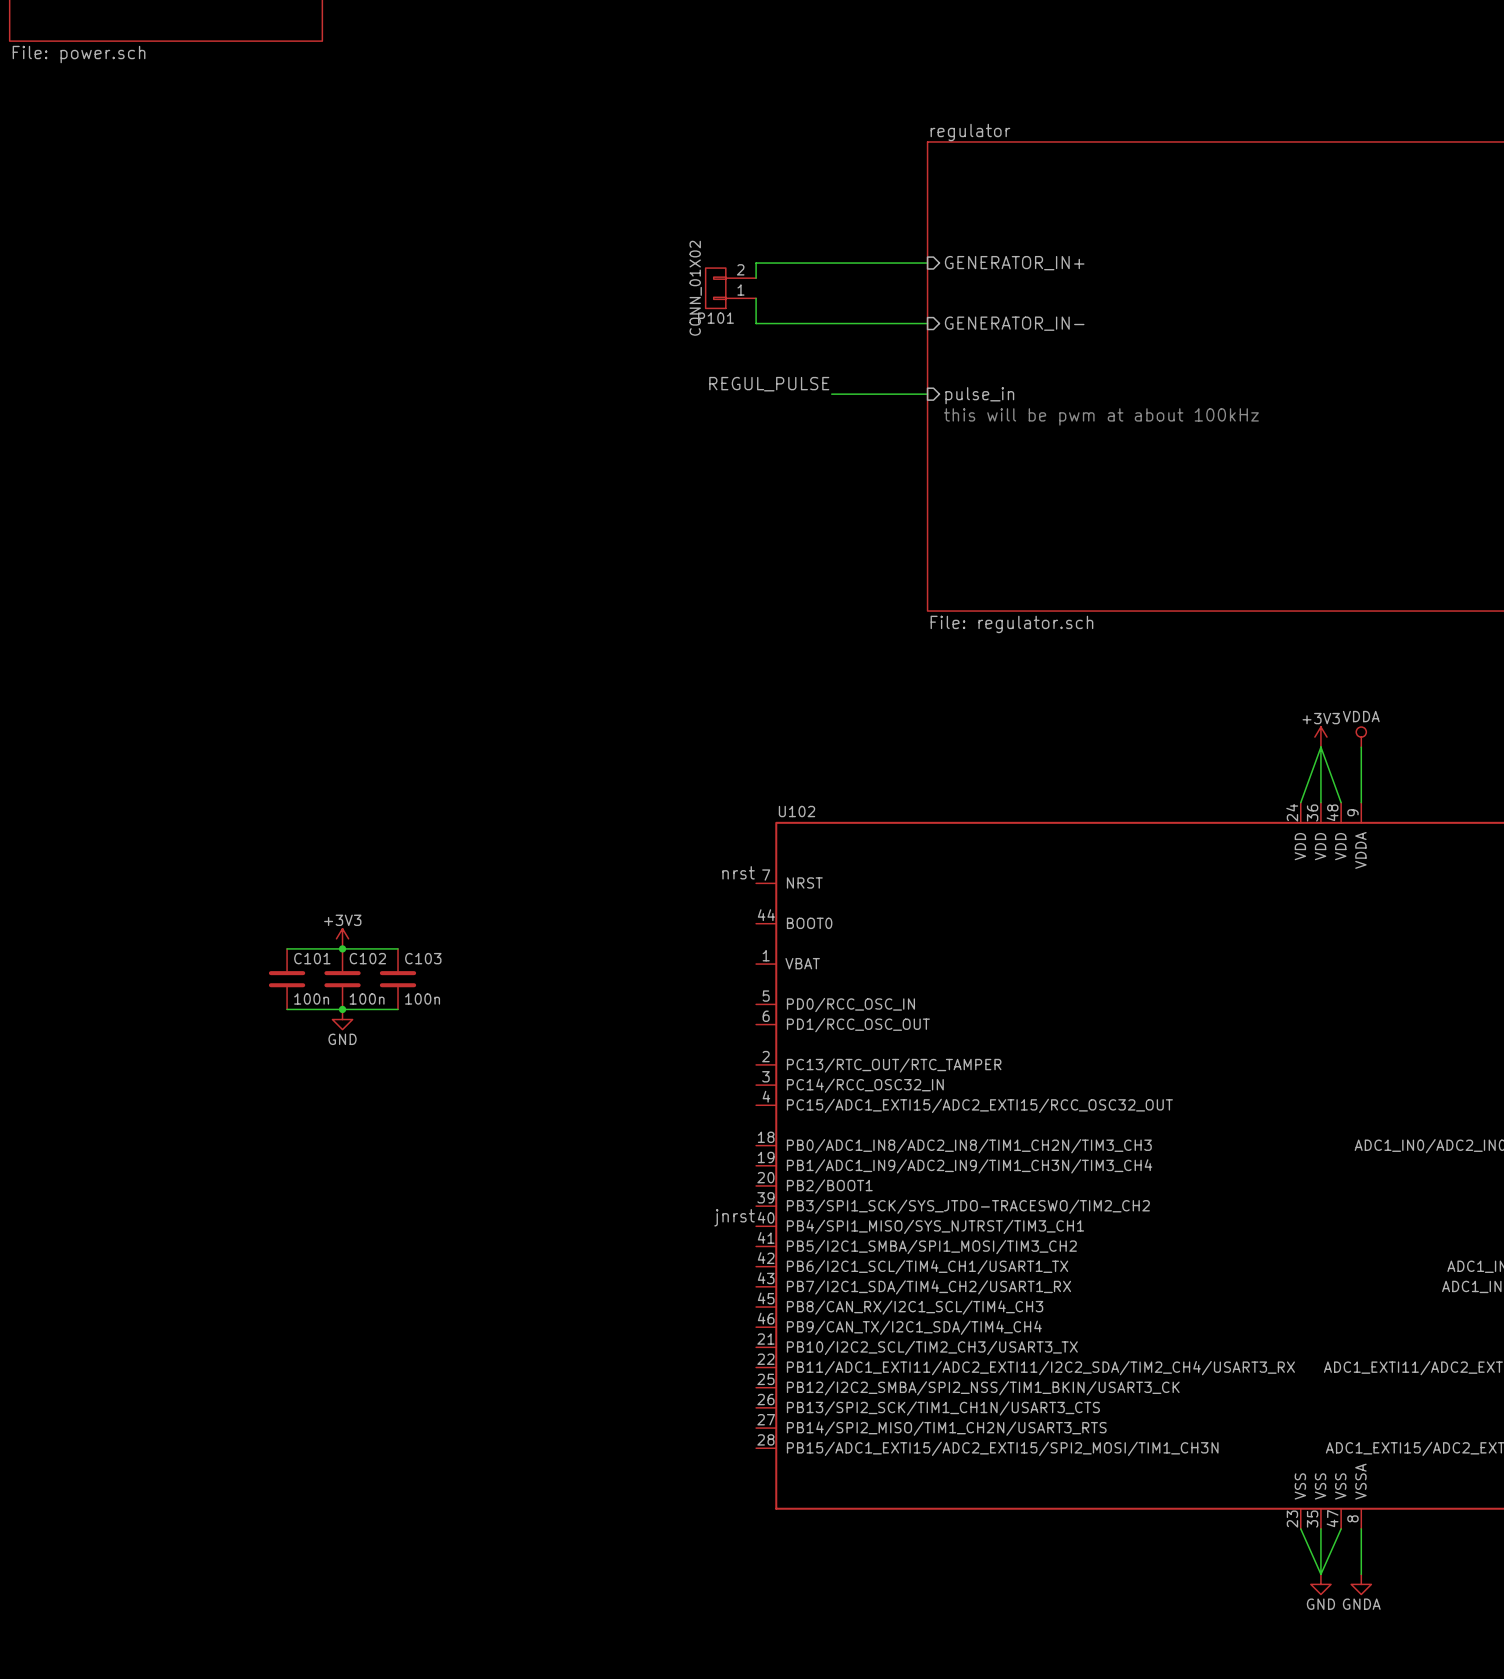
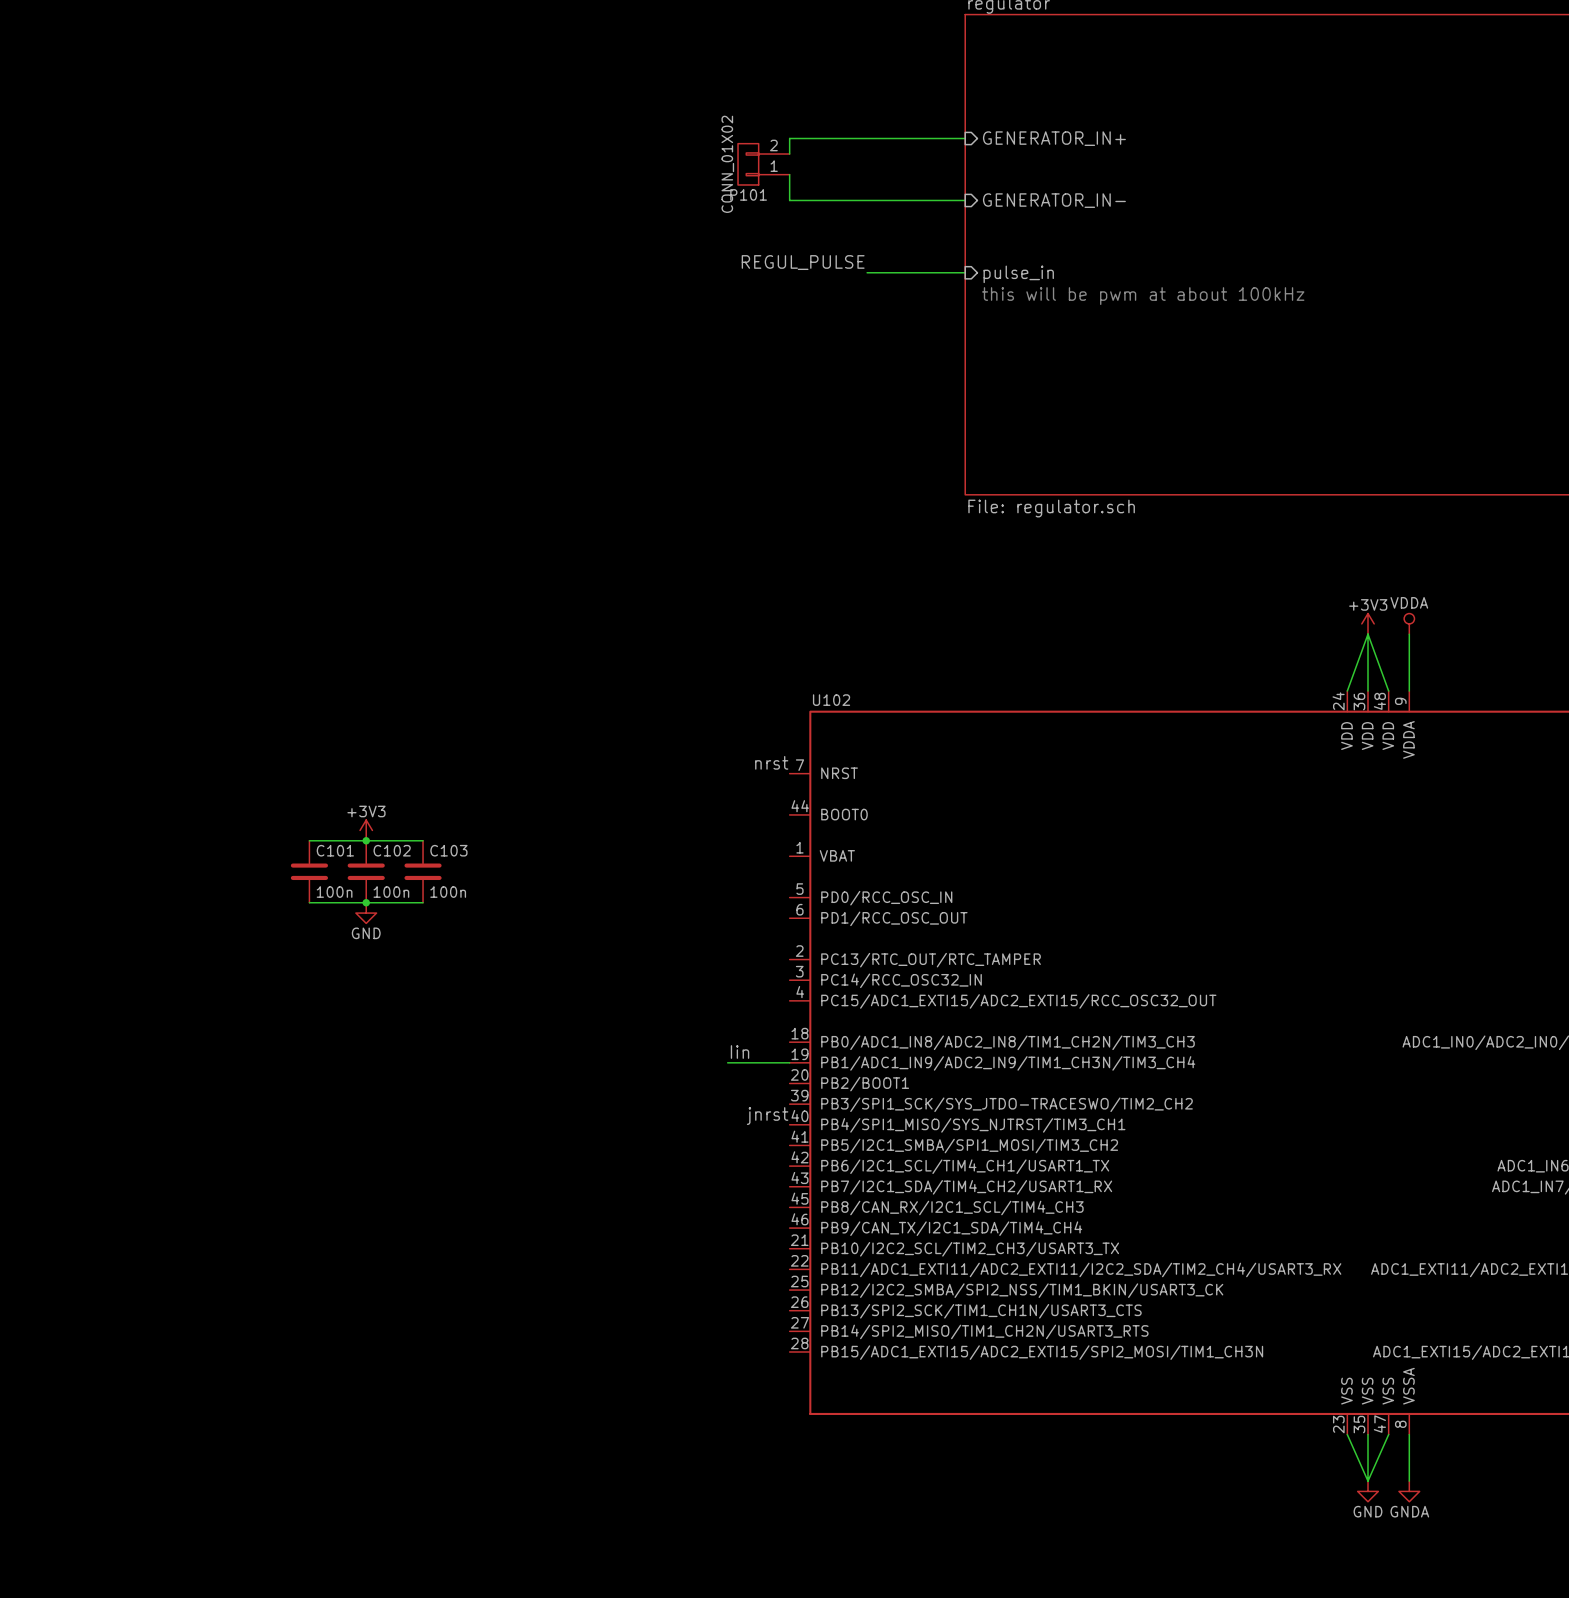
label: none -> Iin (740, 1052)
wire: none -> (727, 1062) (789, 1062)

